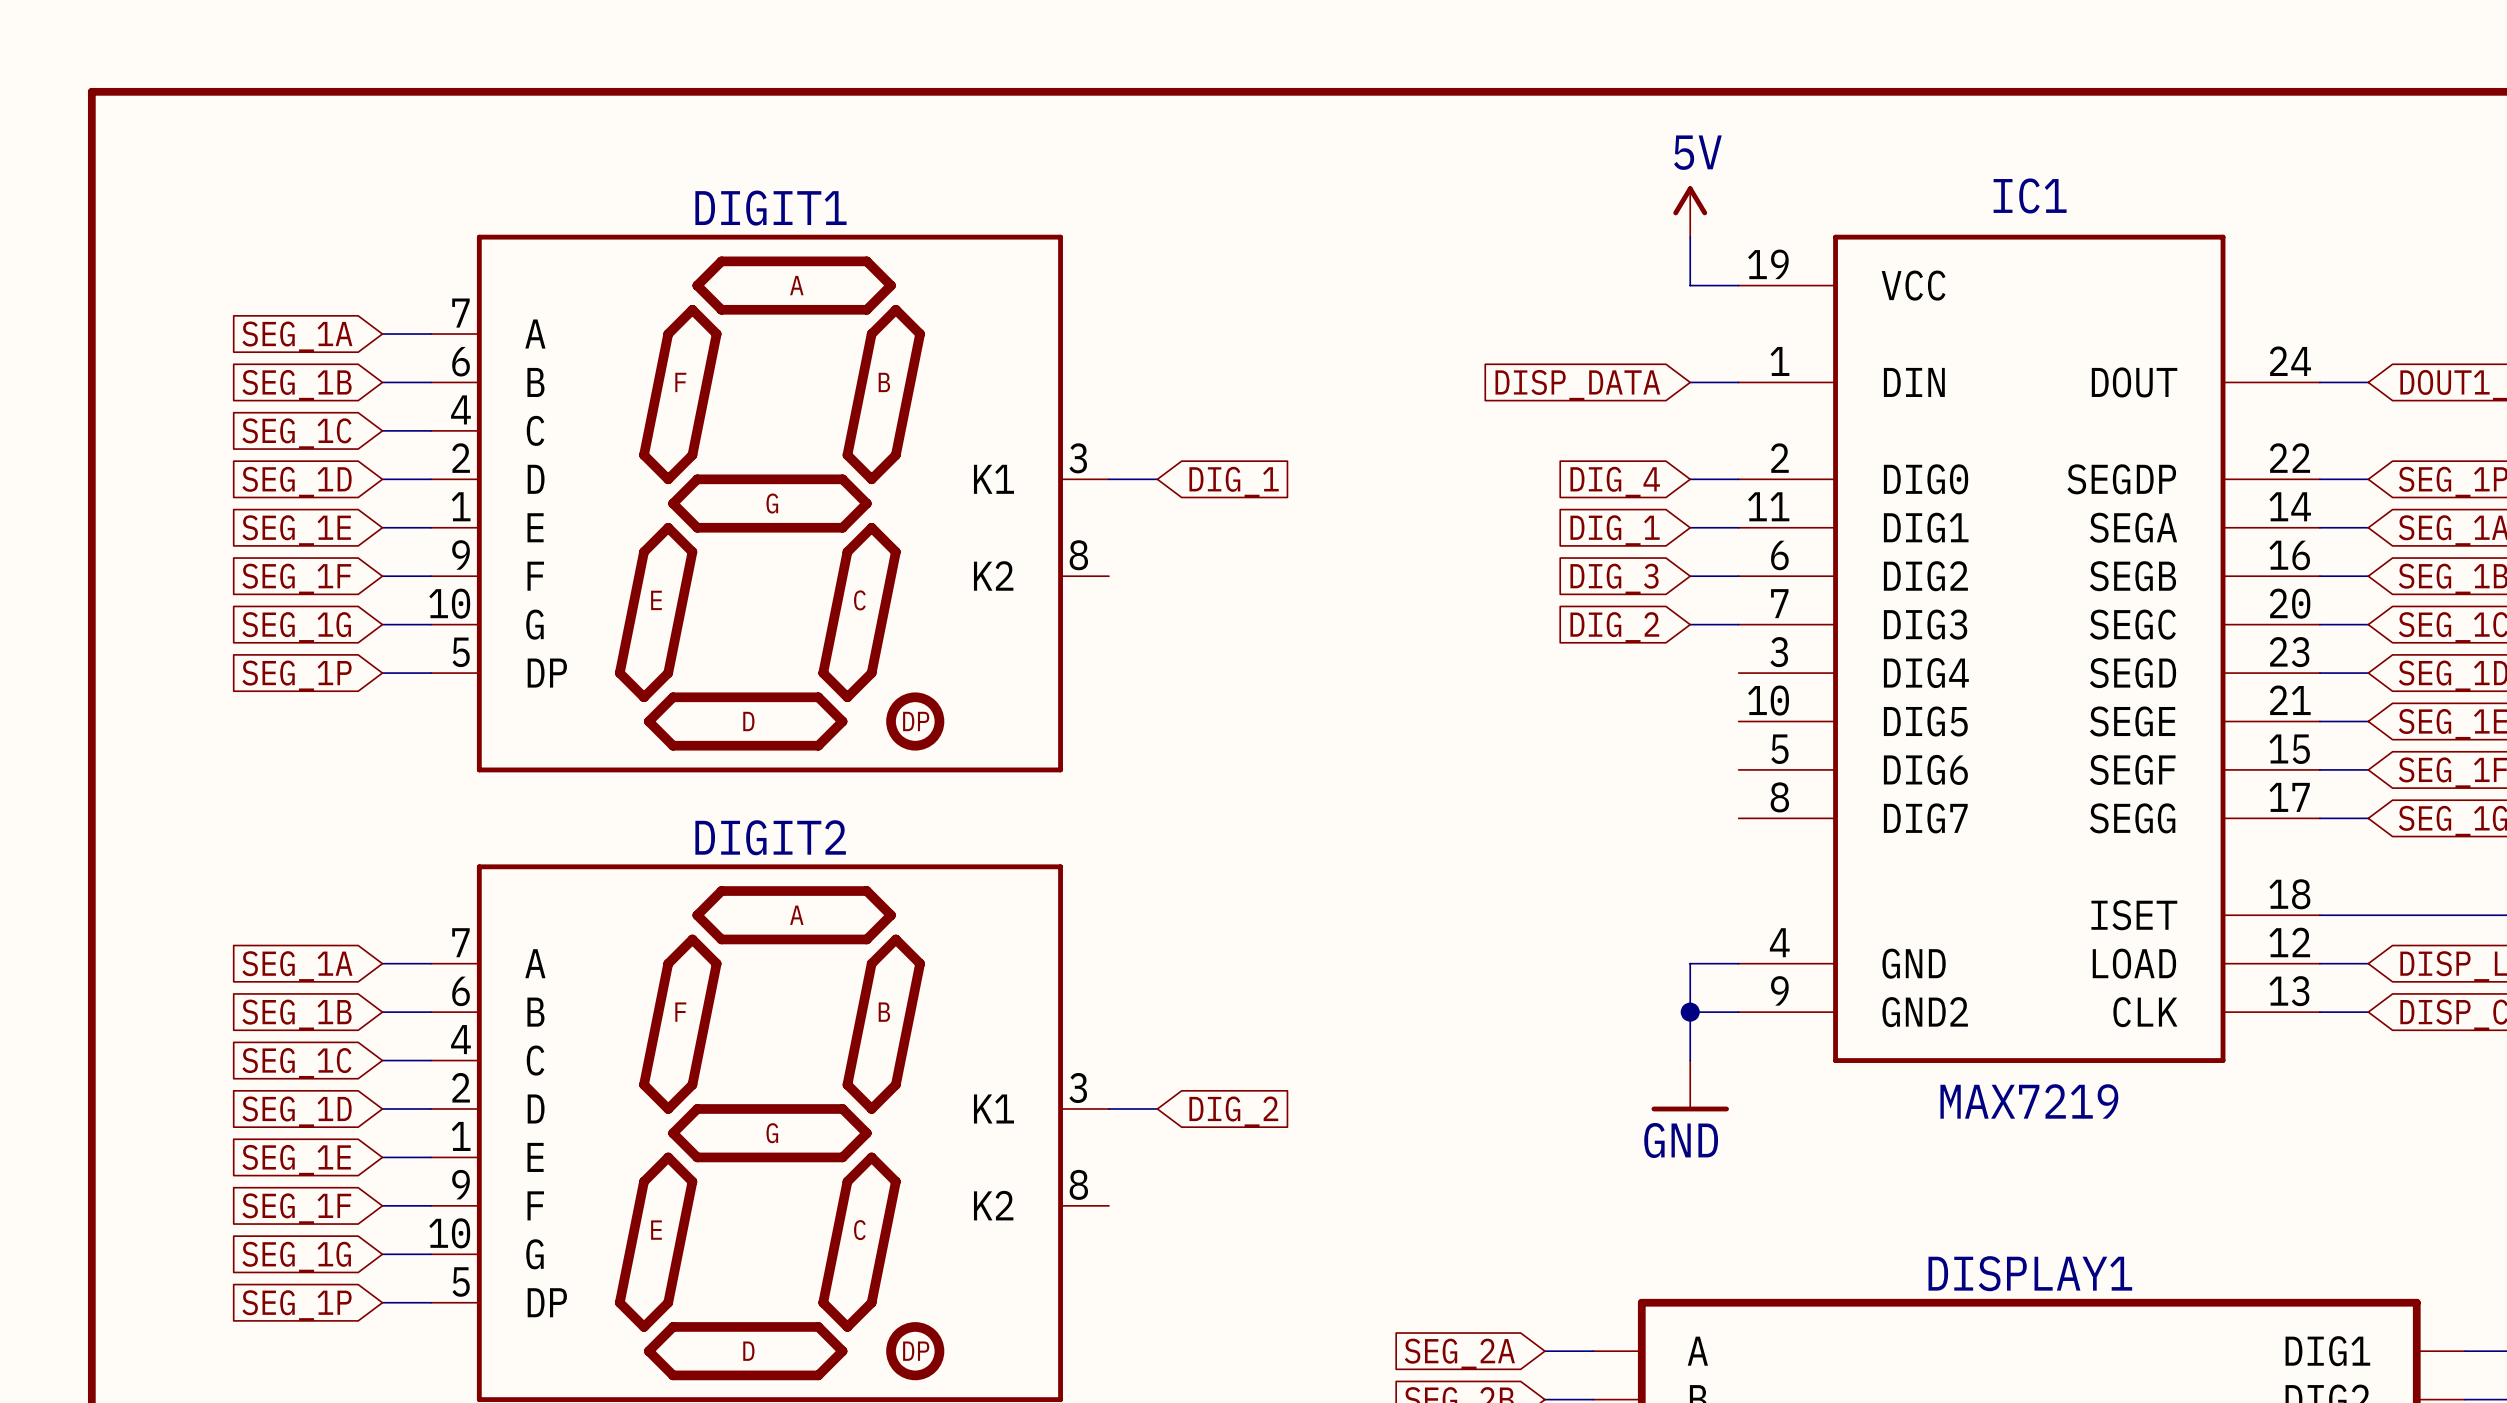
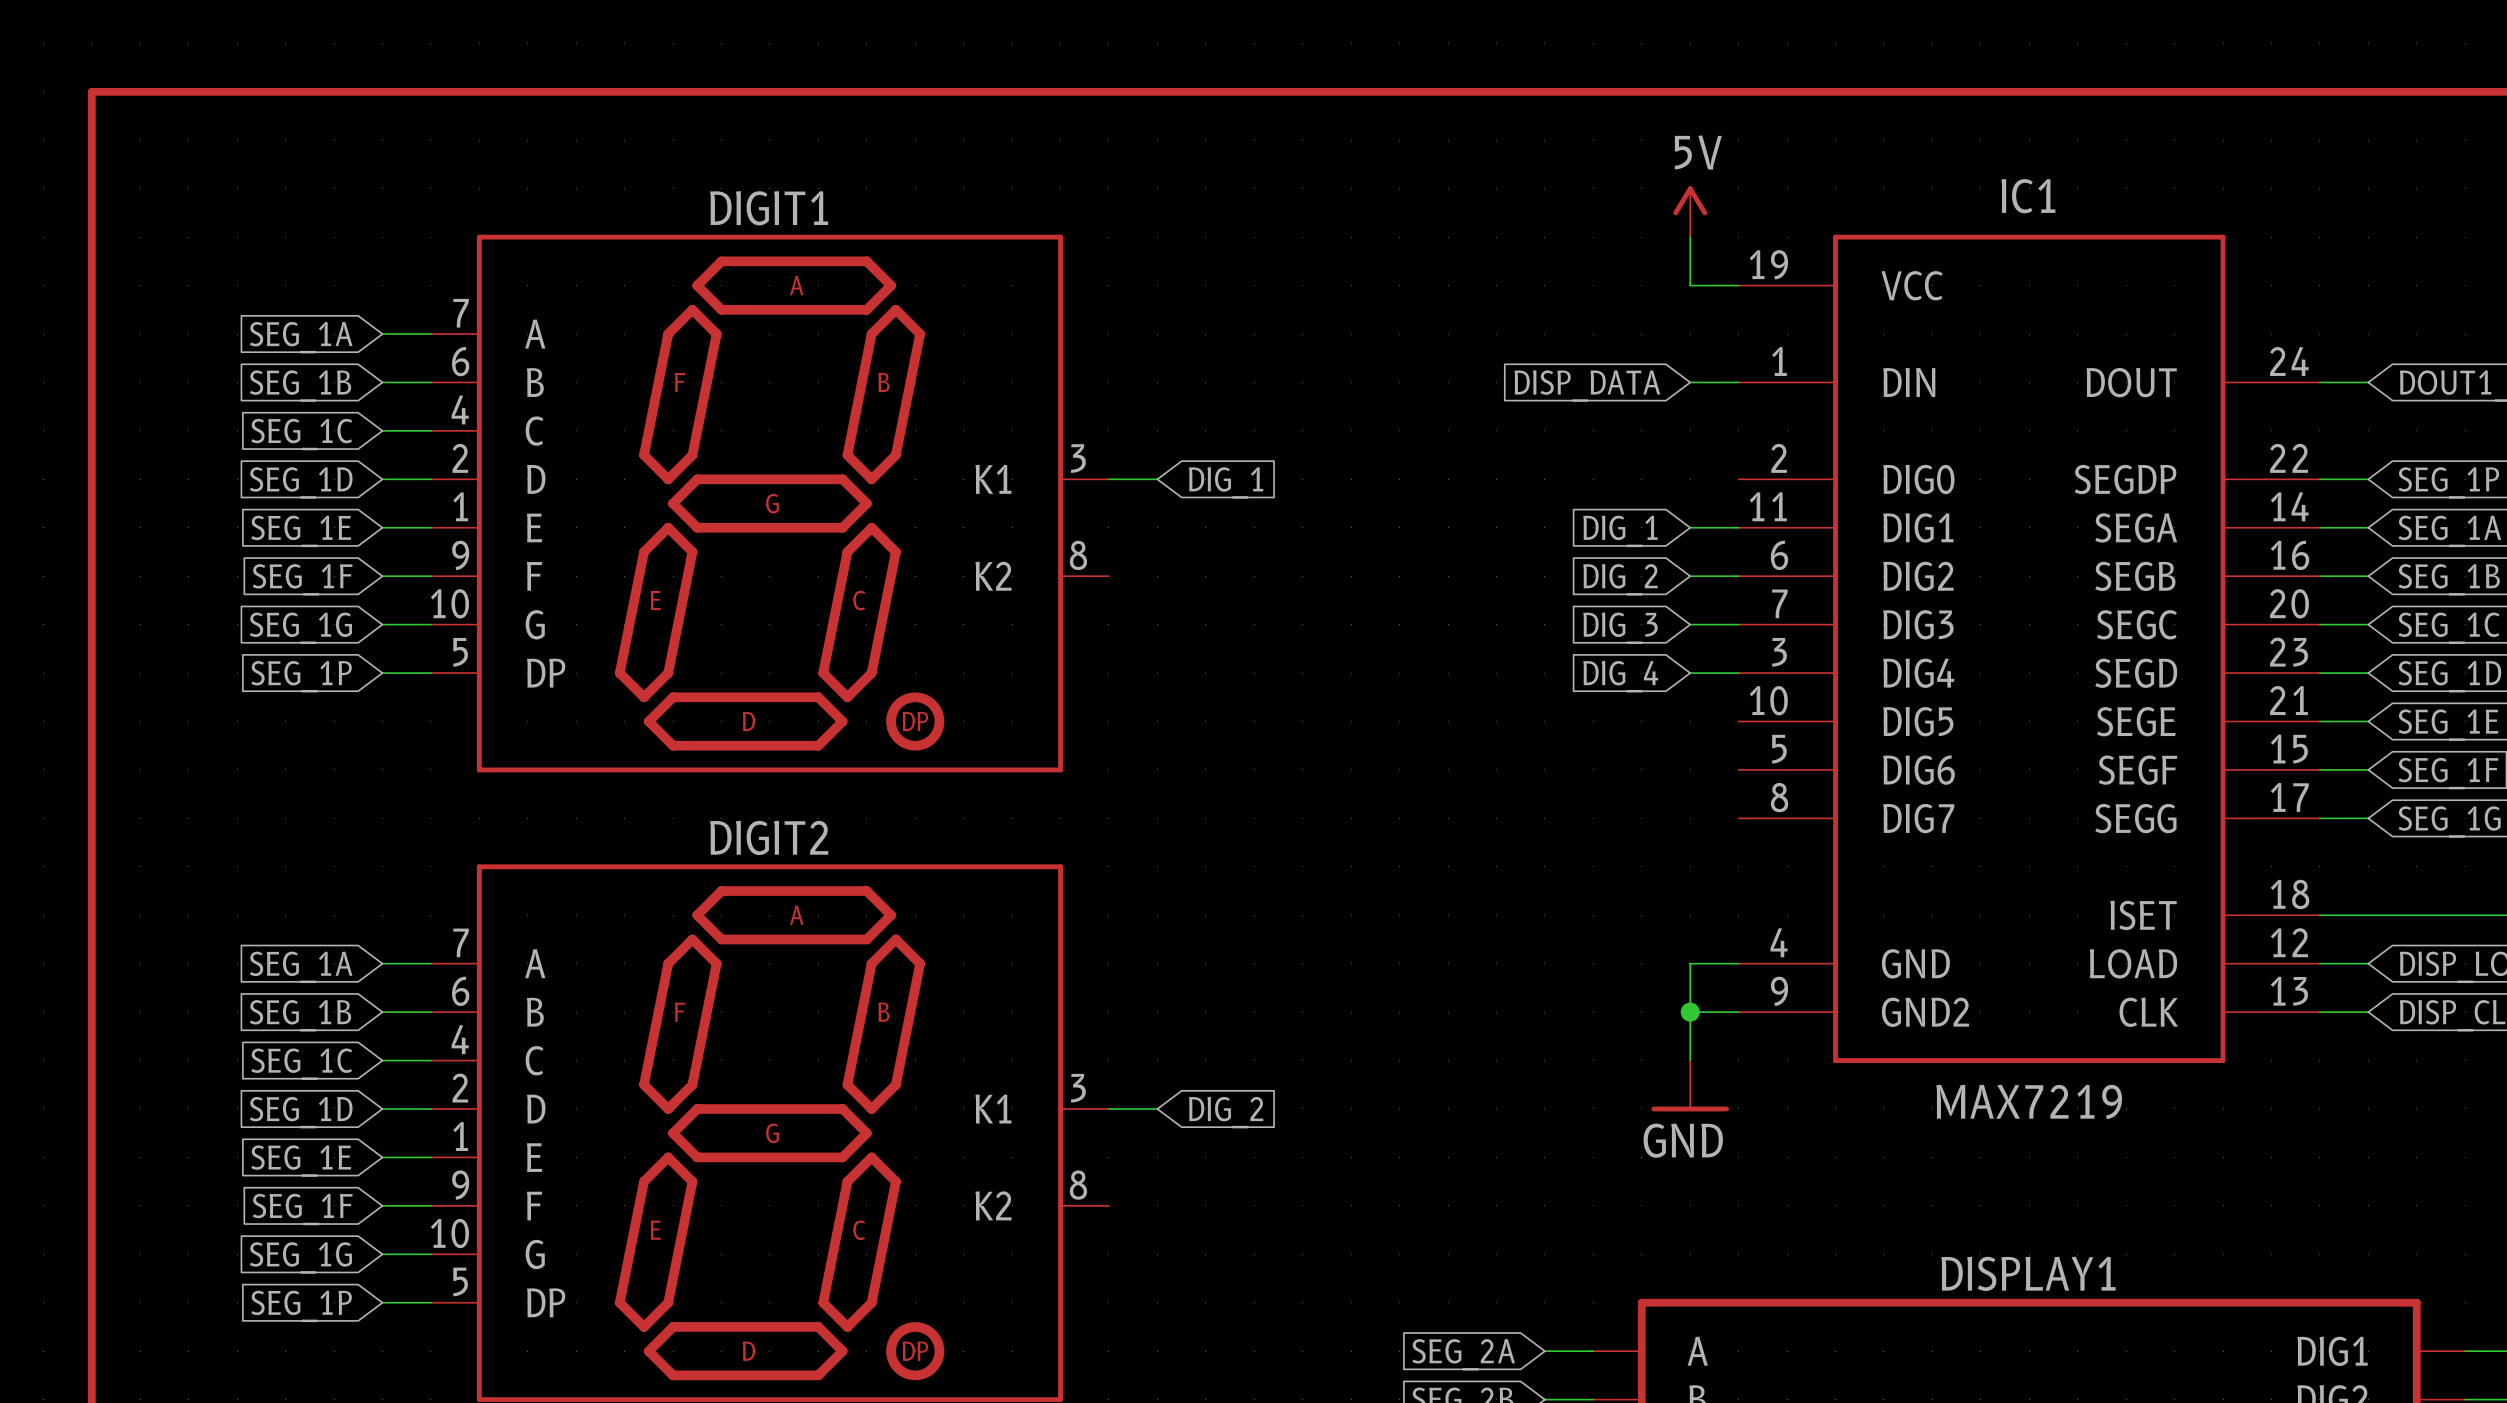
wire: (1690, 479) (1738, 479) -> (1690, 673) (1738, 673)
global label position: DIG_4 (1615, 482) -> DIG_4 (1620, 676)
global label: DIG_3 (1614, 578) -> DIG_2 (1620, 579)
global label: DIG_2 (1614, 627) -> DIG_3 (1620, 628)

